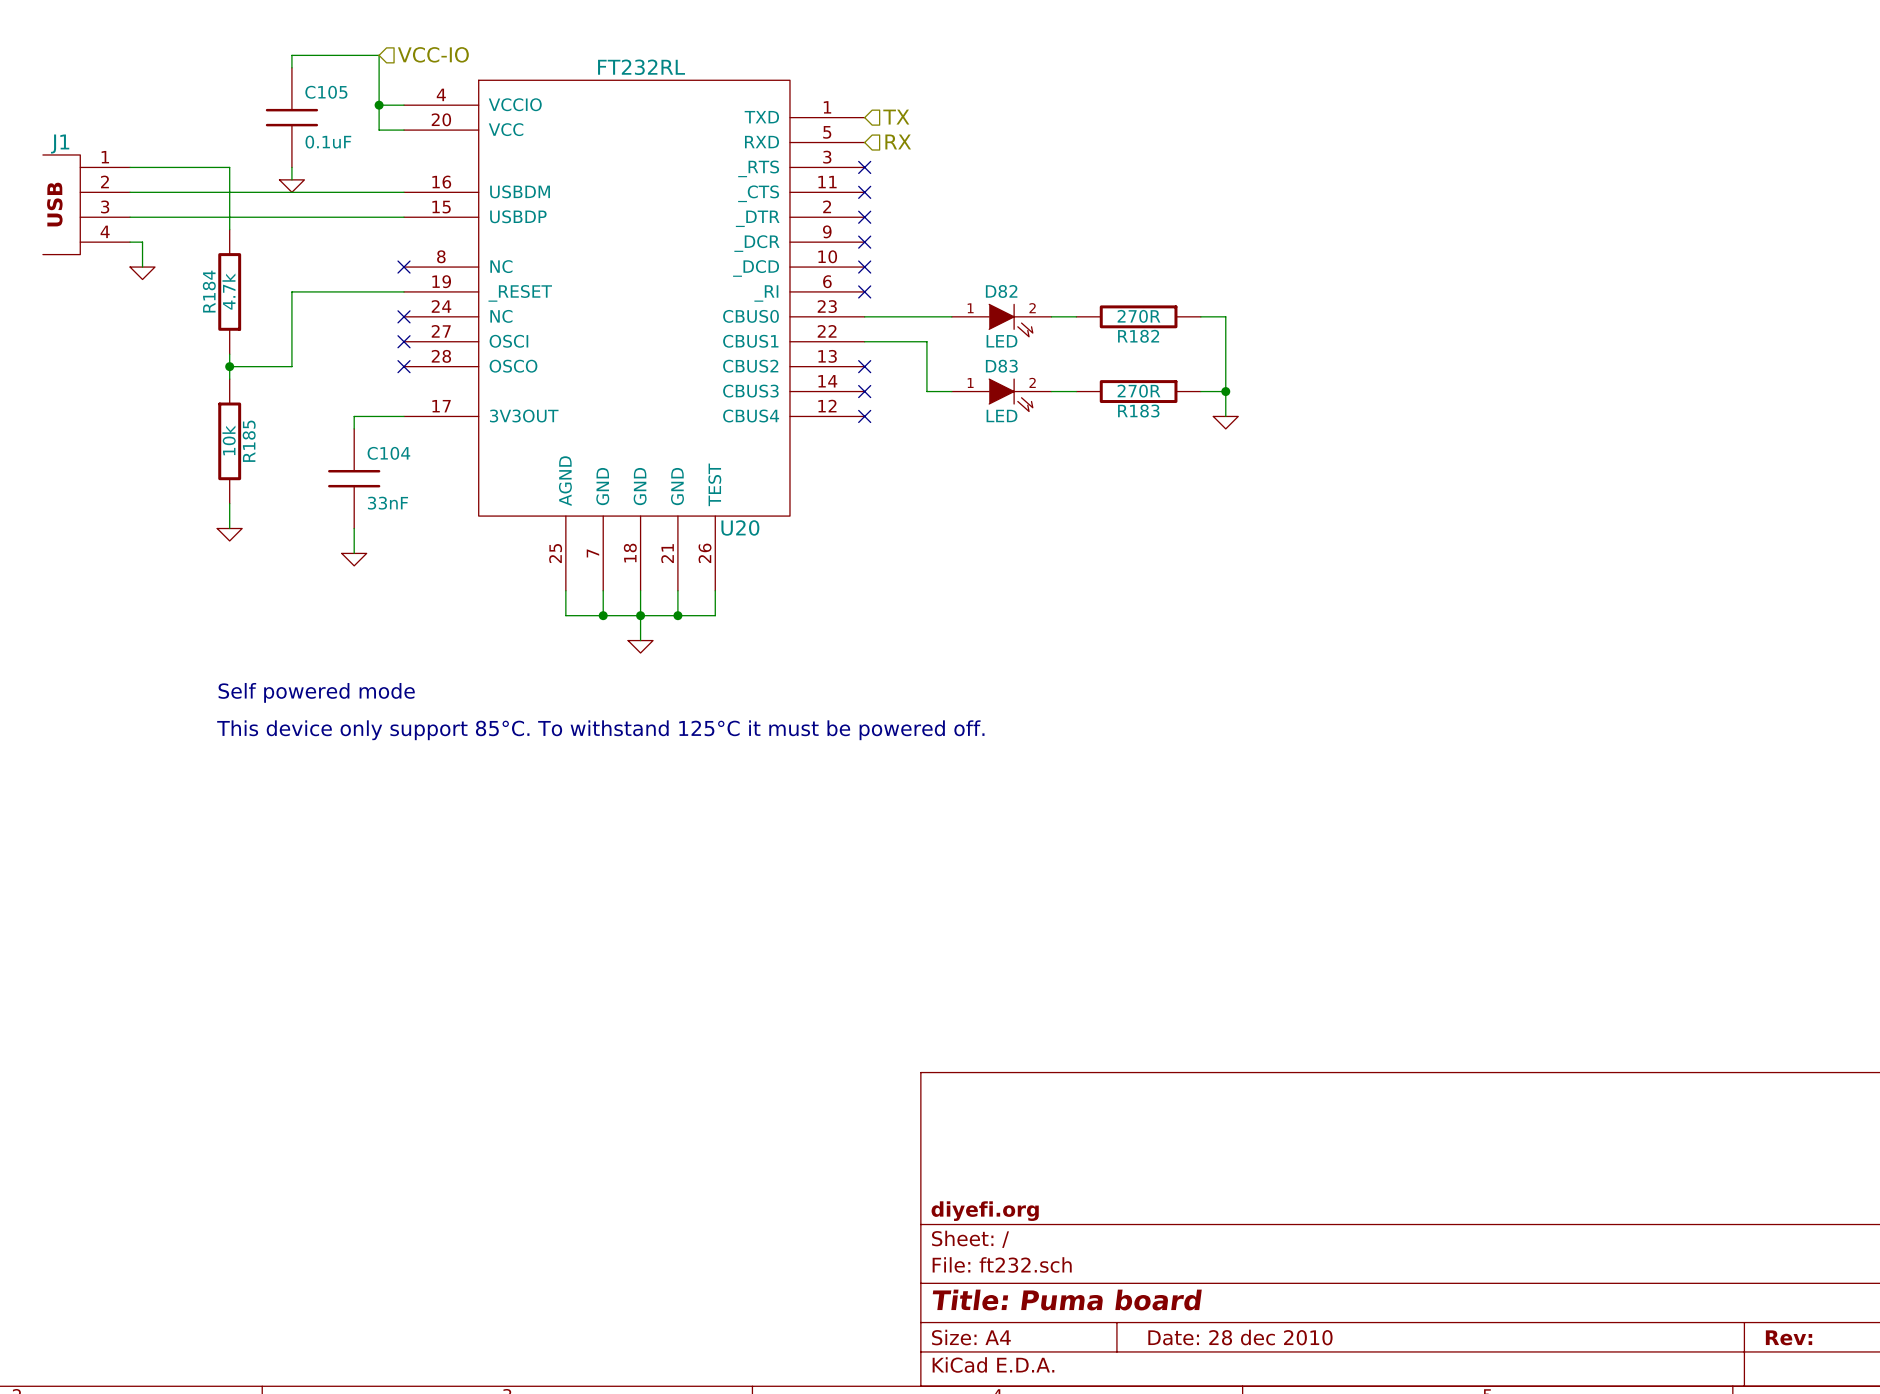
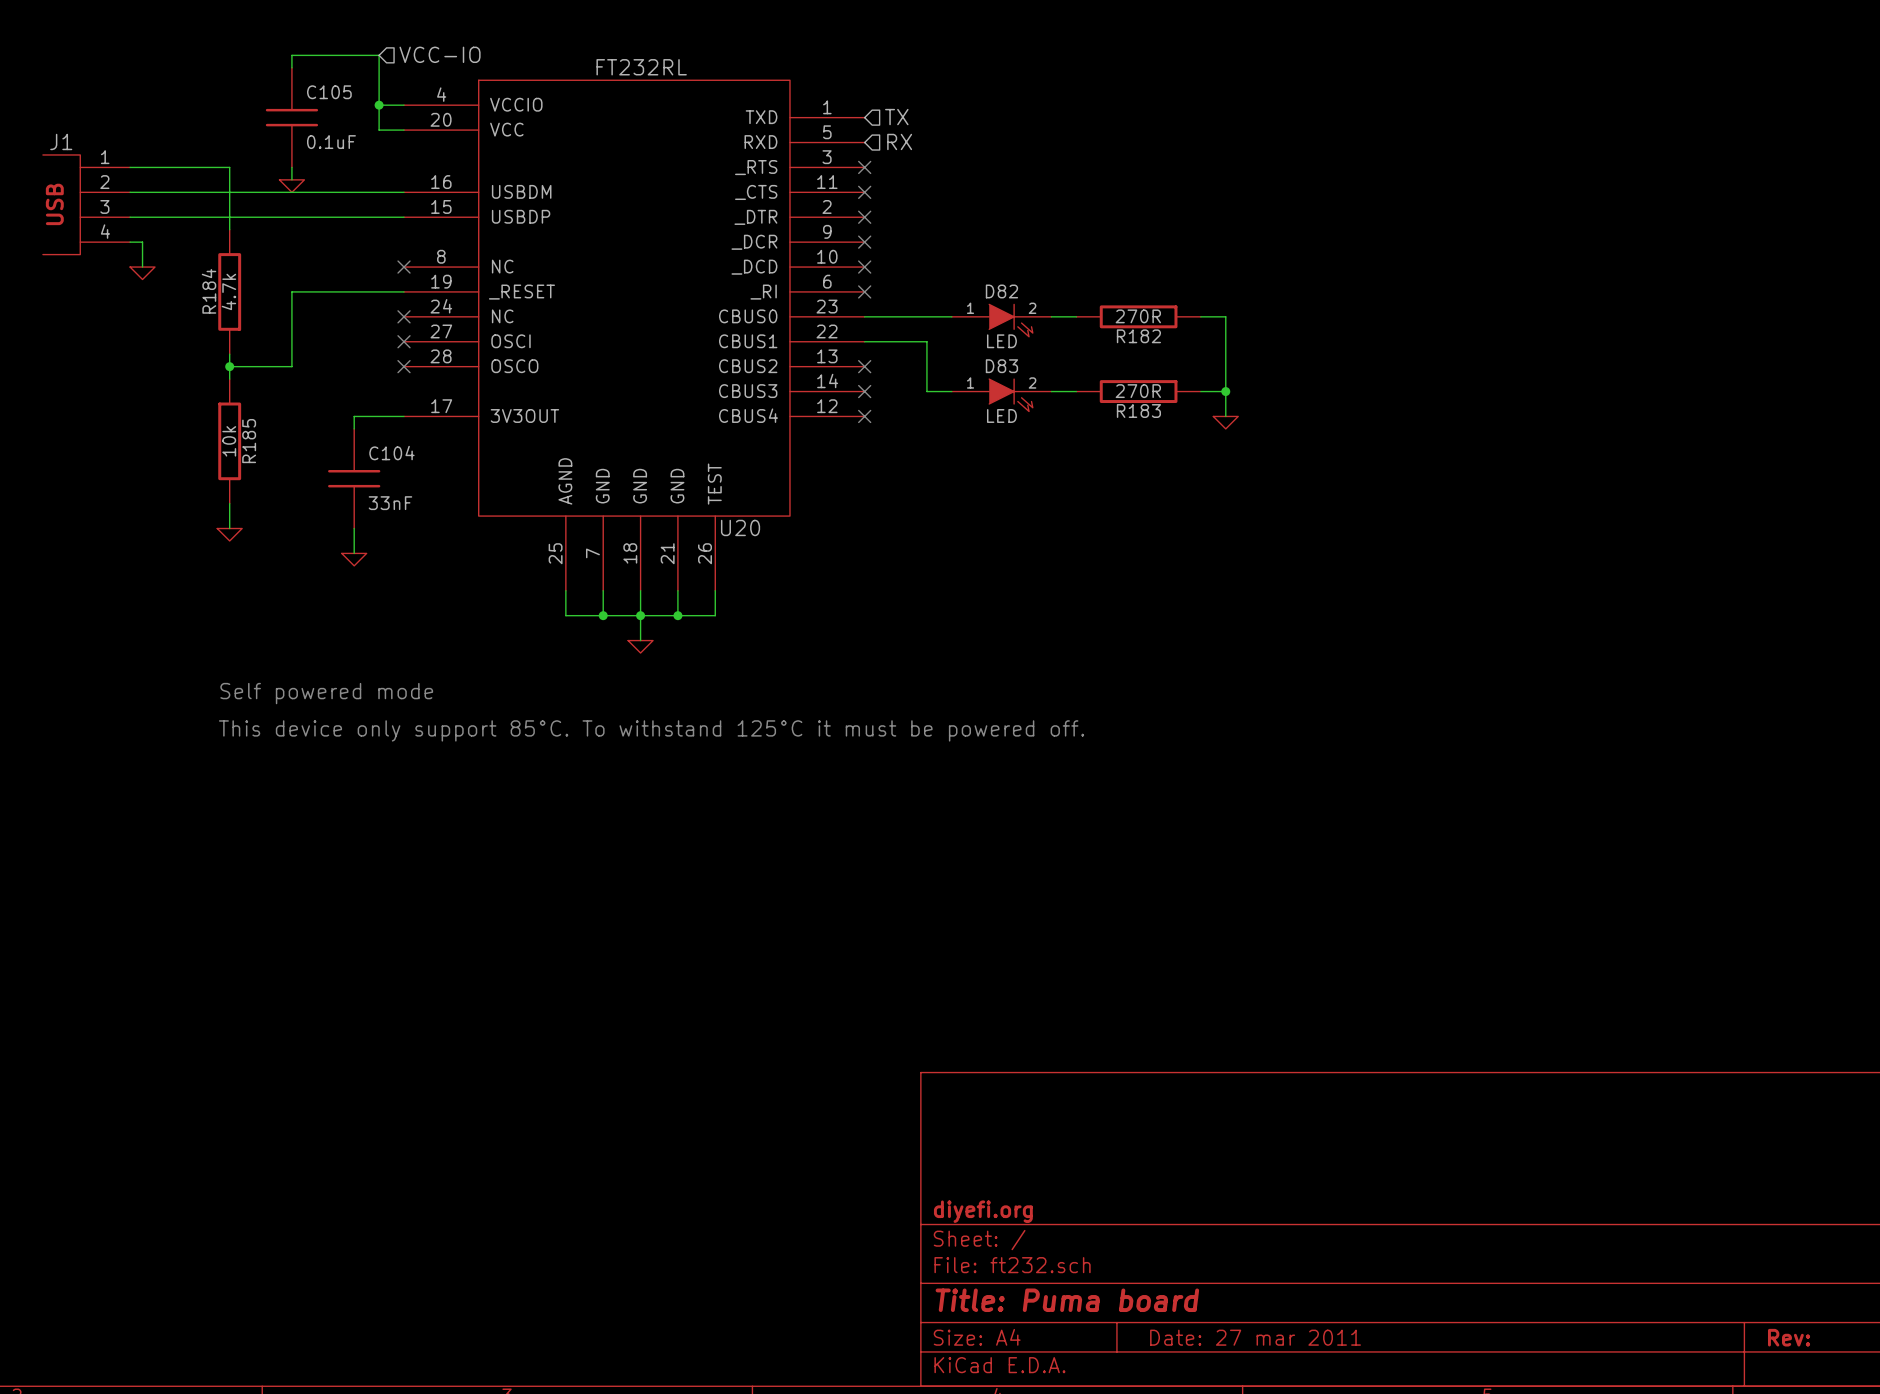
title block: Date: 28 dec 2010 (1240, 1337) -> Date: 27 mar 2011 (1255, 1337)

